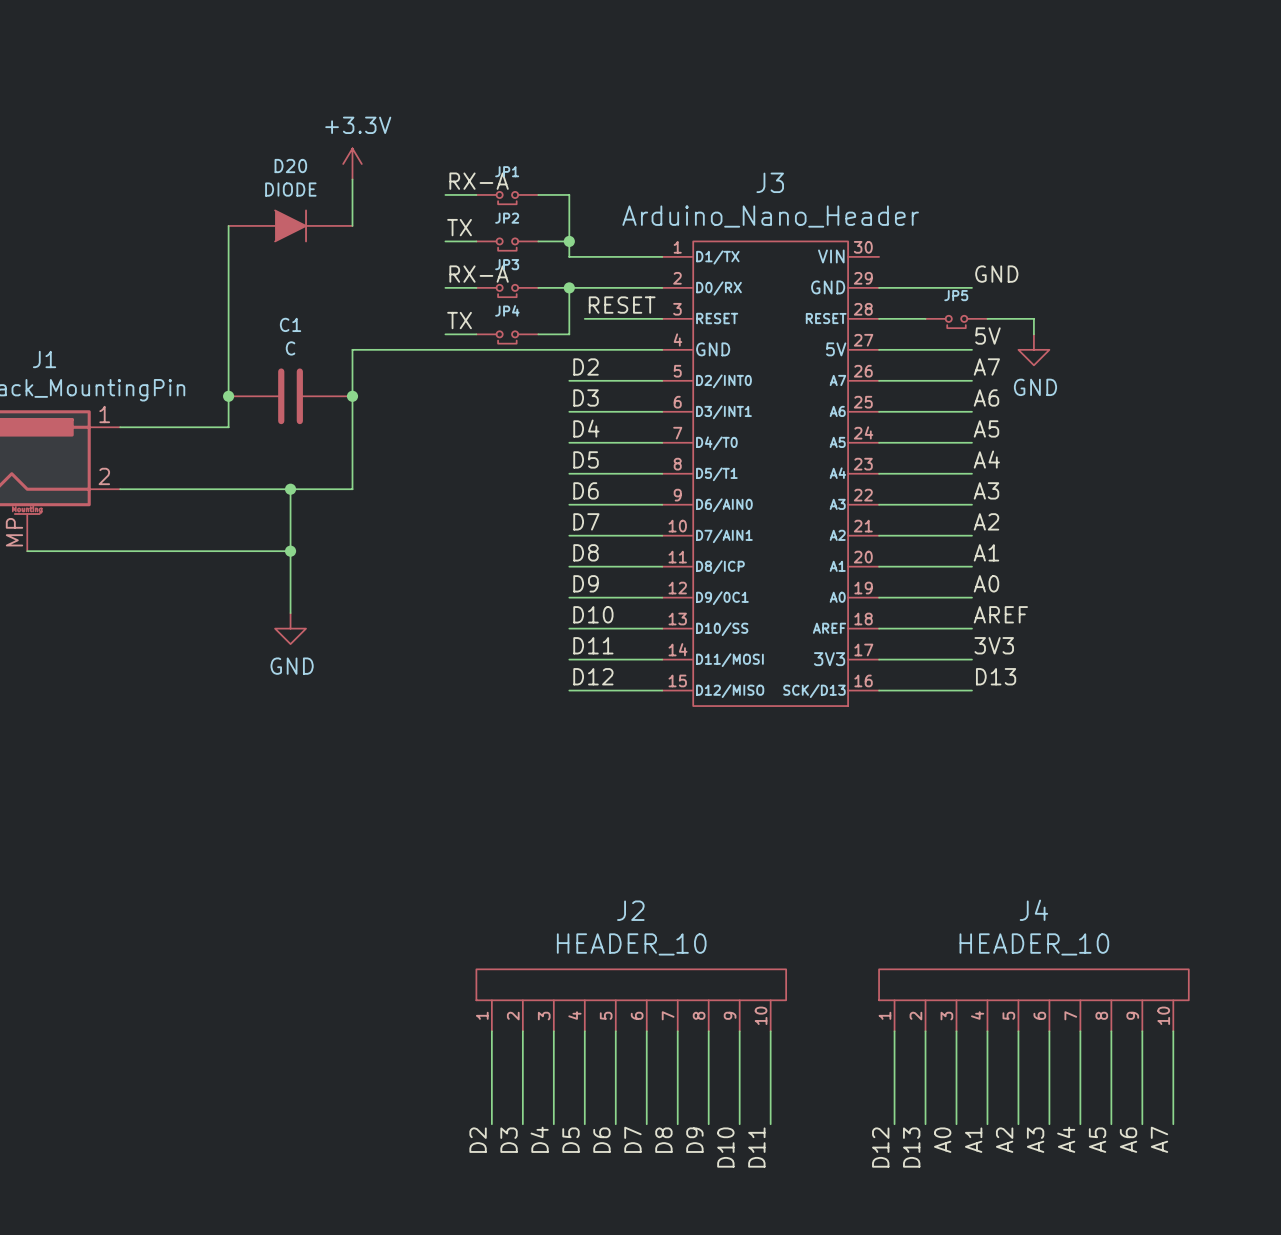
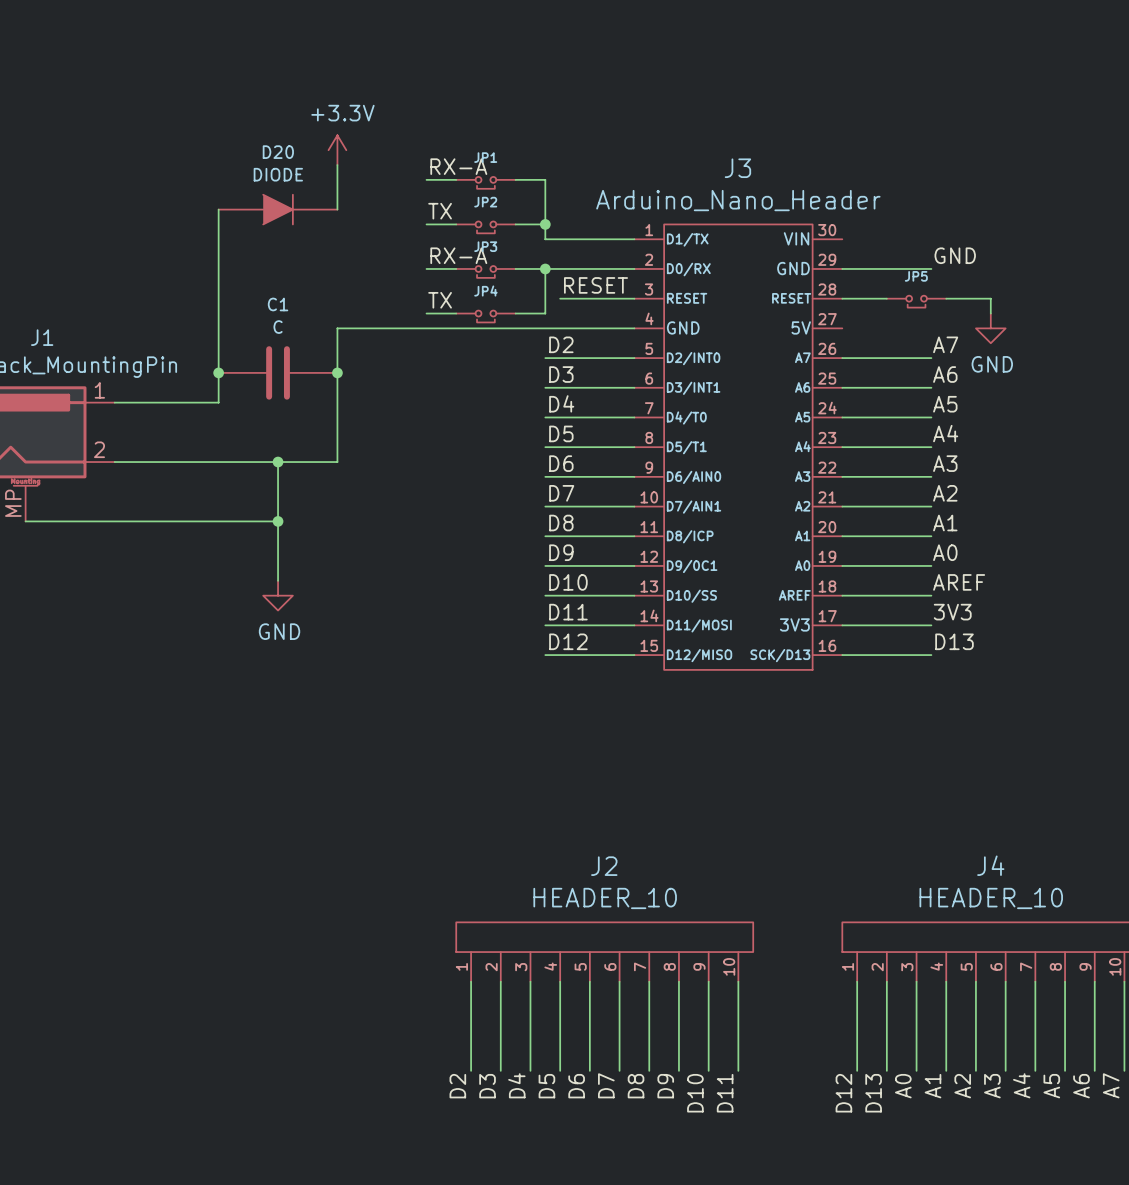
label: 5V (987, 336) -> none
wire: (879, 349) (971, 349) -> none

